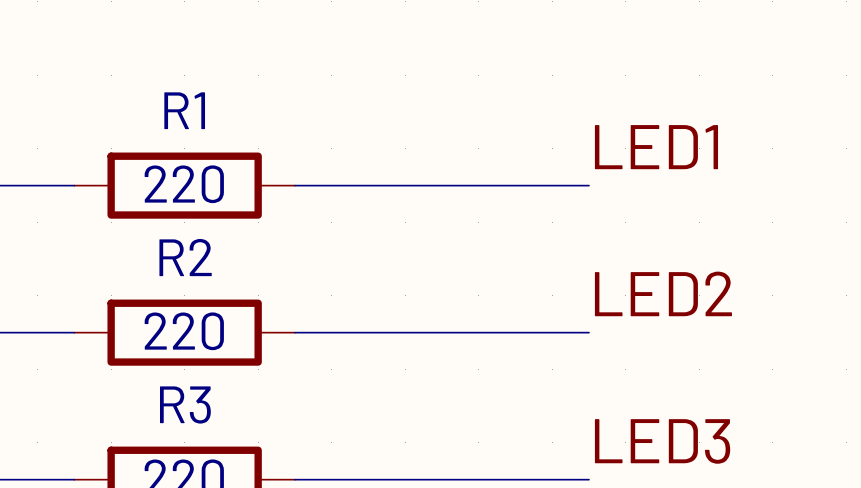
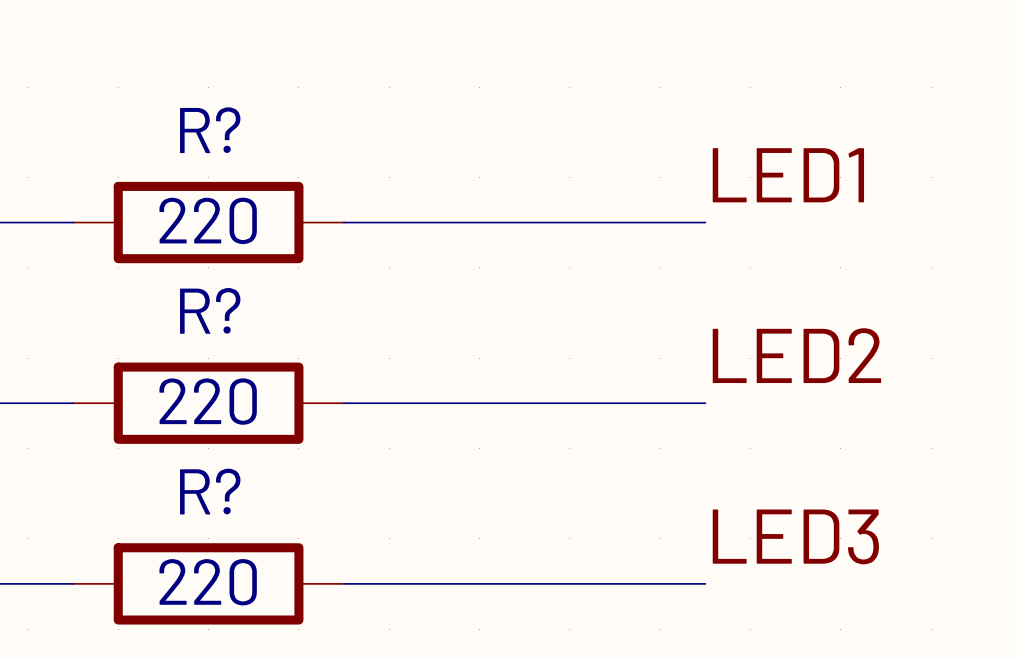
R1 name: R1 (184, 110) -> R? (210, 130)
R2 name: R2 (185, 257) -> R? (210, 310)
R3 name: R3 (185, 404) -> R? (210, 491)

